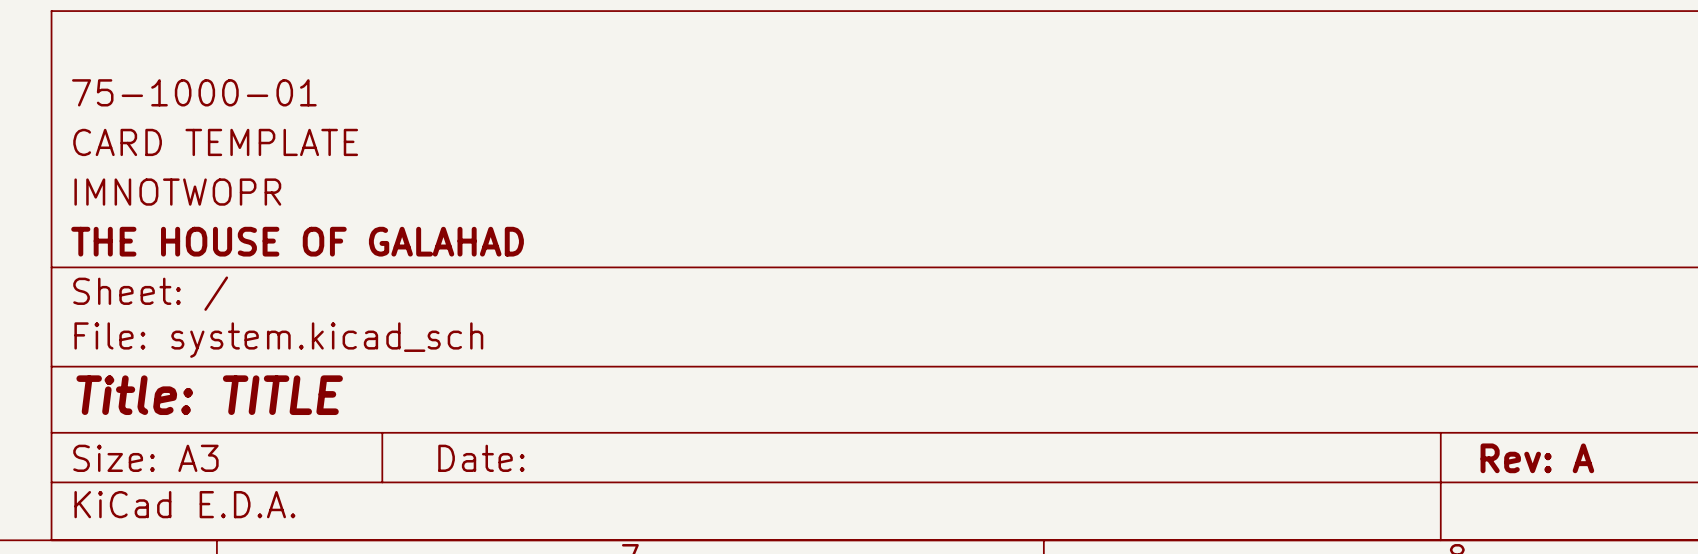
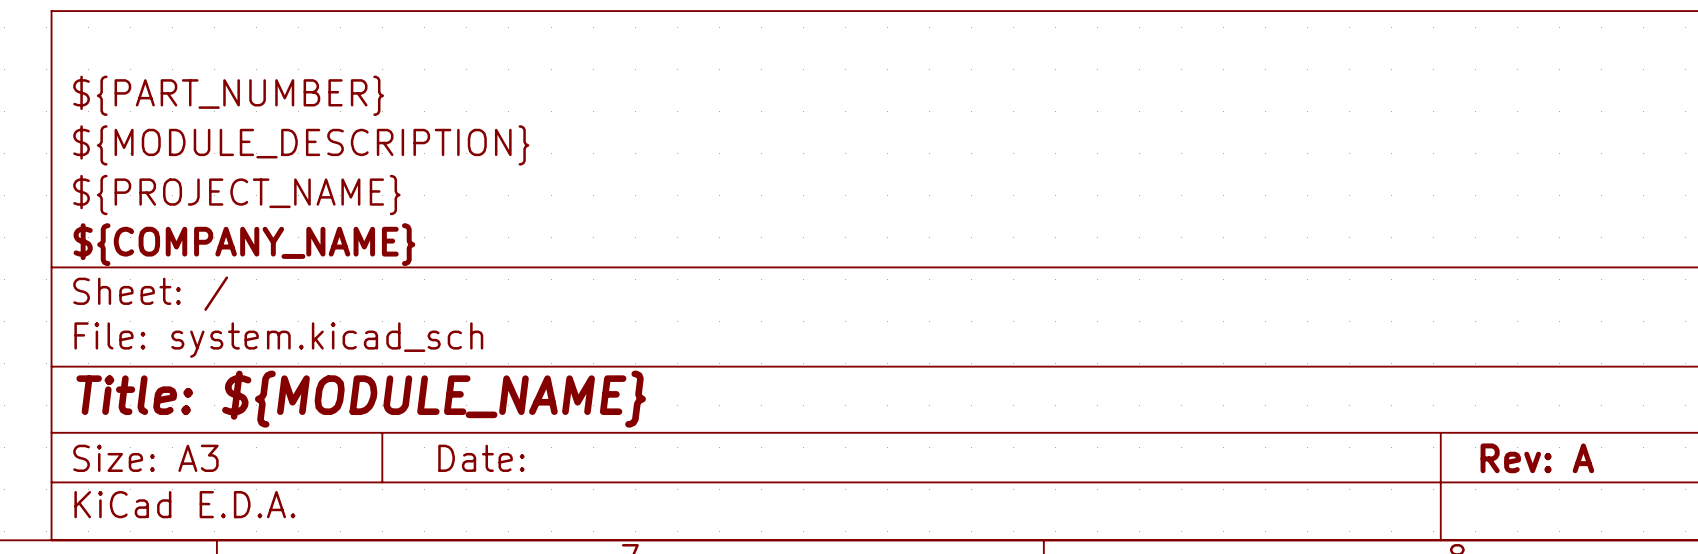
title block: 75-1000-01 (194, 92) -> ${PART_NUMBER} (228, 95)
title block: CARD TEMPLATE (215, 142) -> ${MODULE_DESCRIPTION} (301, 145)
title block: IMNOTWOPR (177, 192) -> ${PROJECT_NAME} (236, 195)
title block: THE HOUSE OF GALAHAD (297, 241) -> ${COMPANY_NAME} (244, 244)
title block: Title: TITLE (209, 395) -> Title: ${MODULE_NAME} (361, 399)

